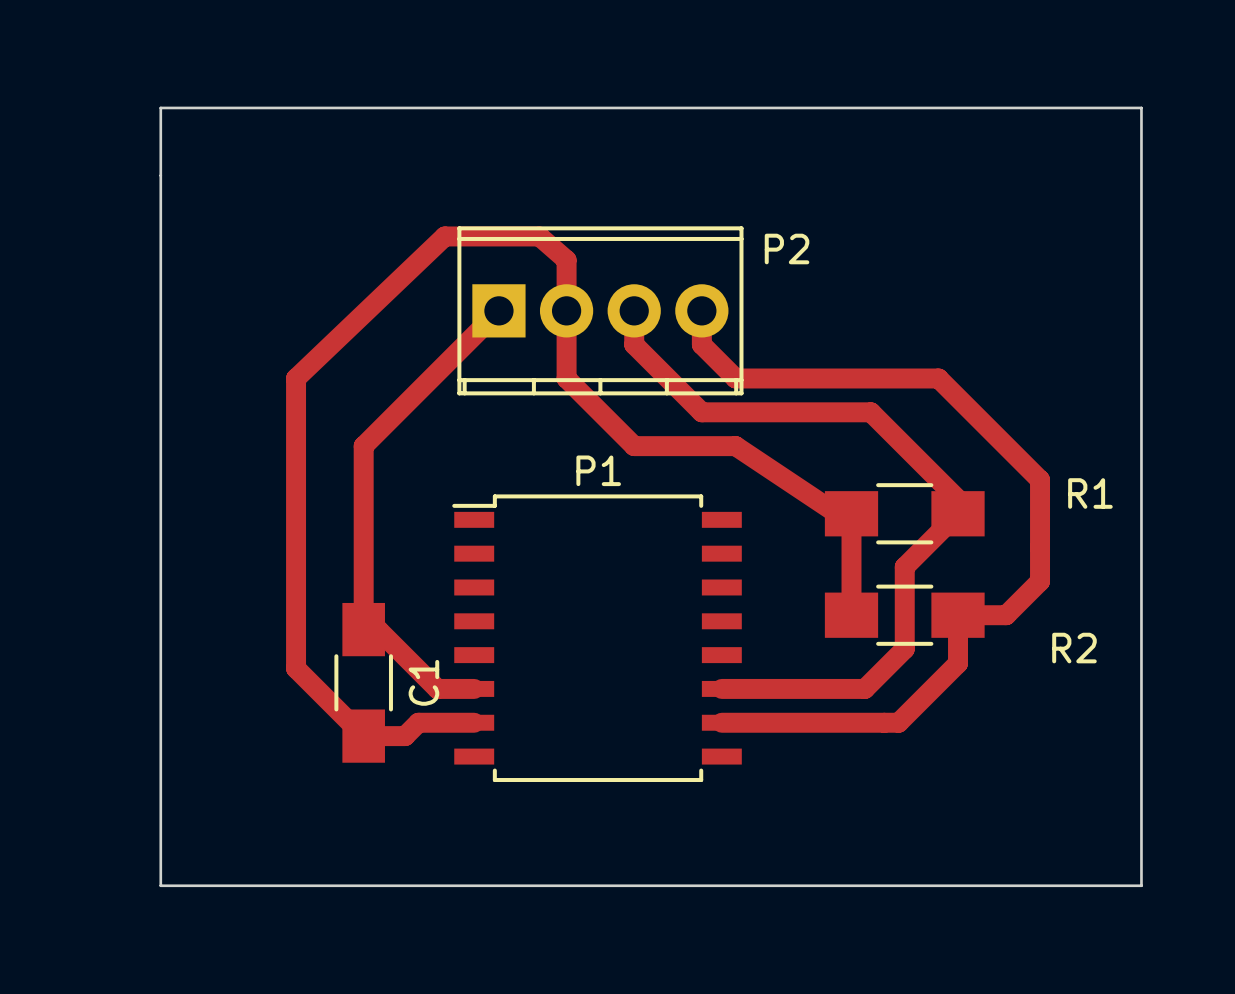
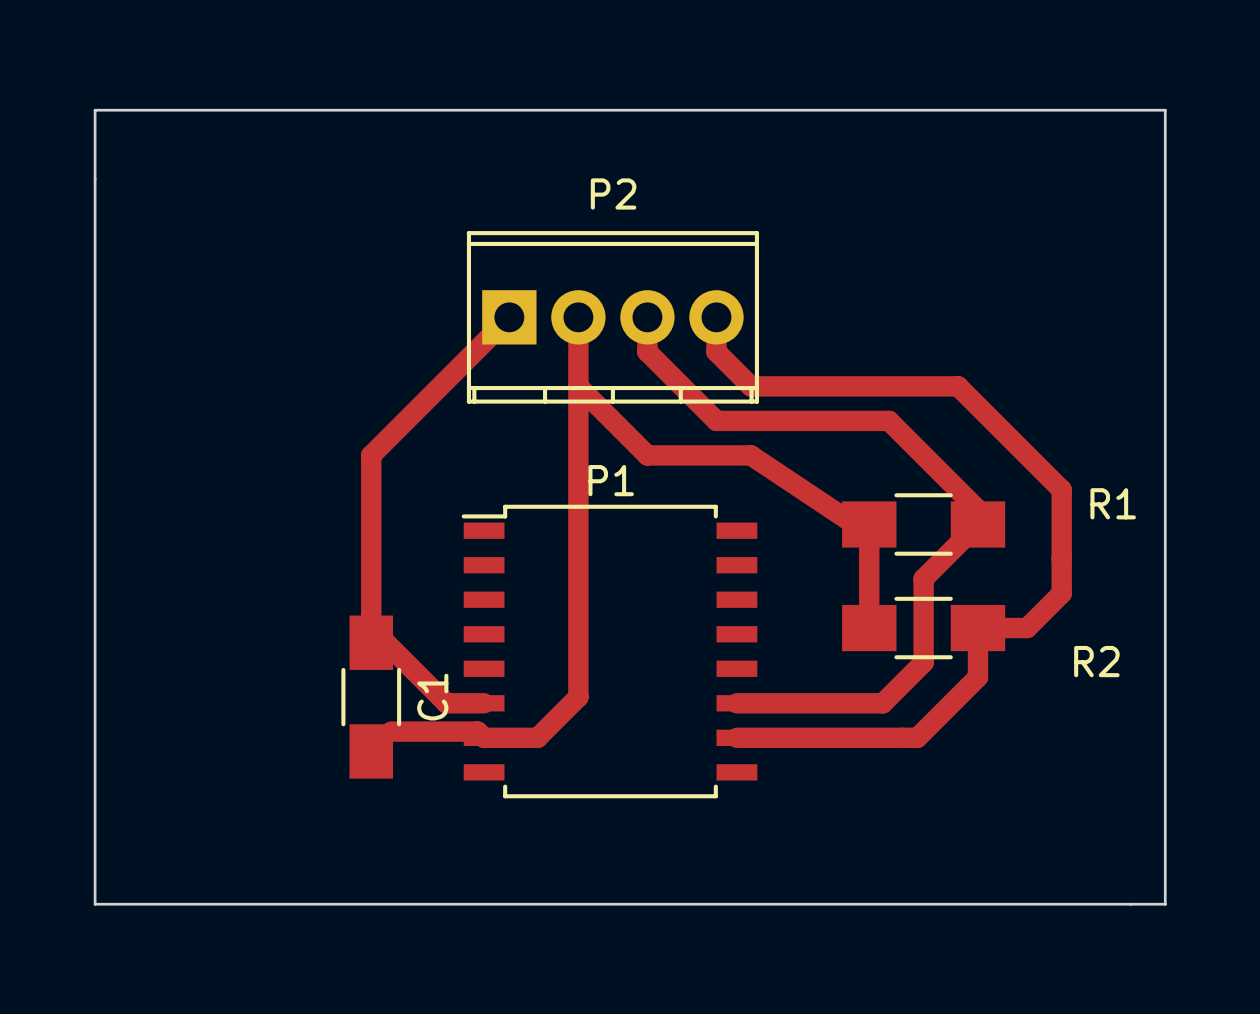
board edge: (160, 107) (160, 885) -> (164, 110) (95, 110) (95, 904) (164, 904)
P2 name position: P2 (787, 248) -> P2 (613, 193)
track: (566, 310) (566, 260) (539, 236) (444, 236) (296, 378) (296, 668) (363, 736) (405, 736) (418, 722) (474, 722) -> none
track: none -> (578, 386) (578, 697) (537, 737) (484, 737) (477, 731) (391, 731)

